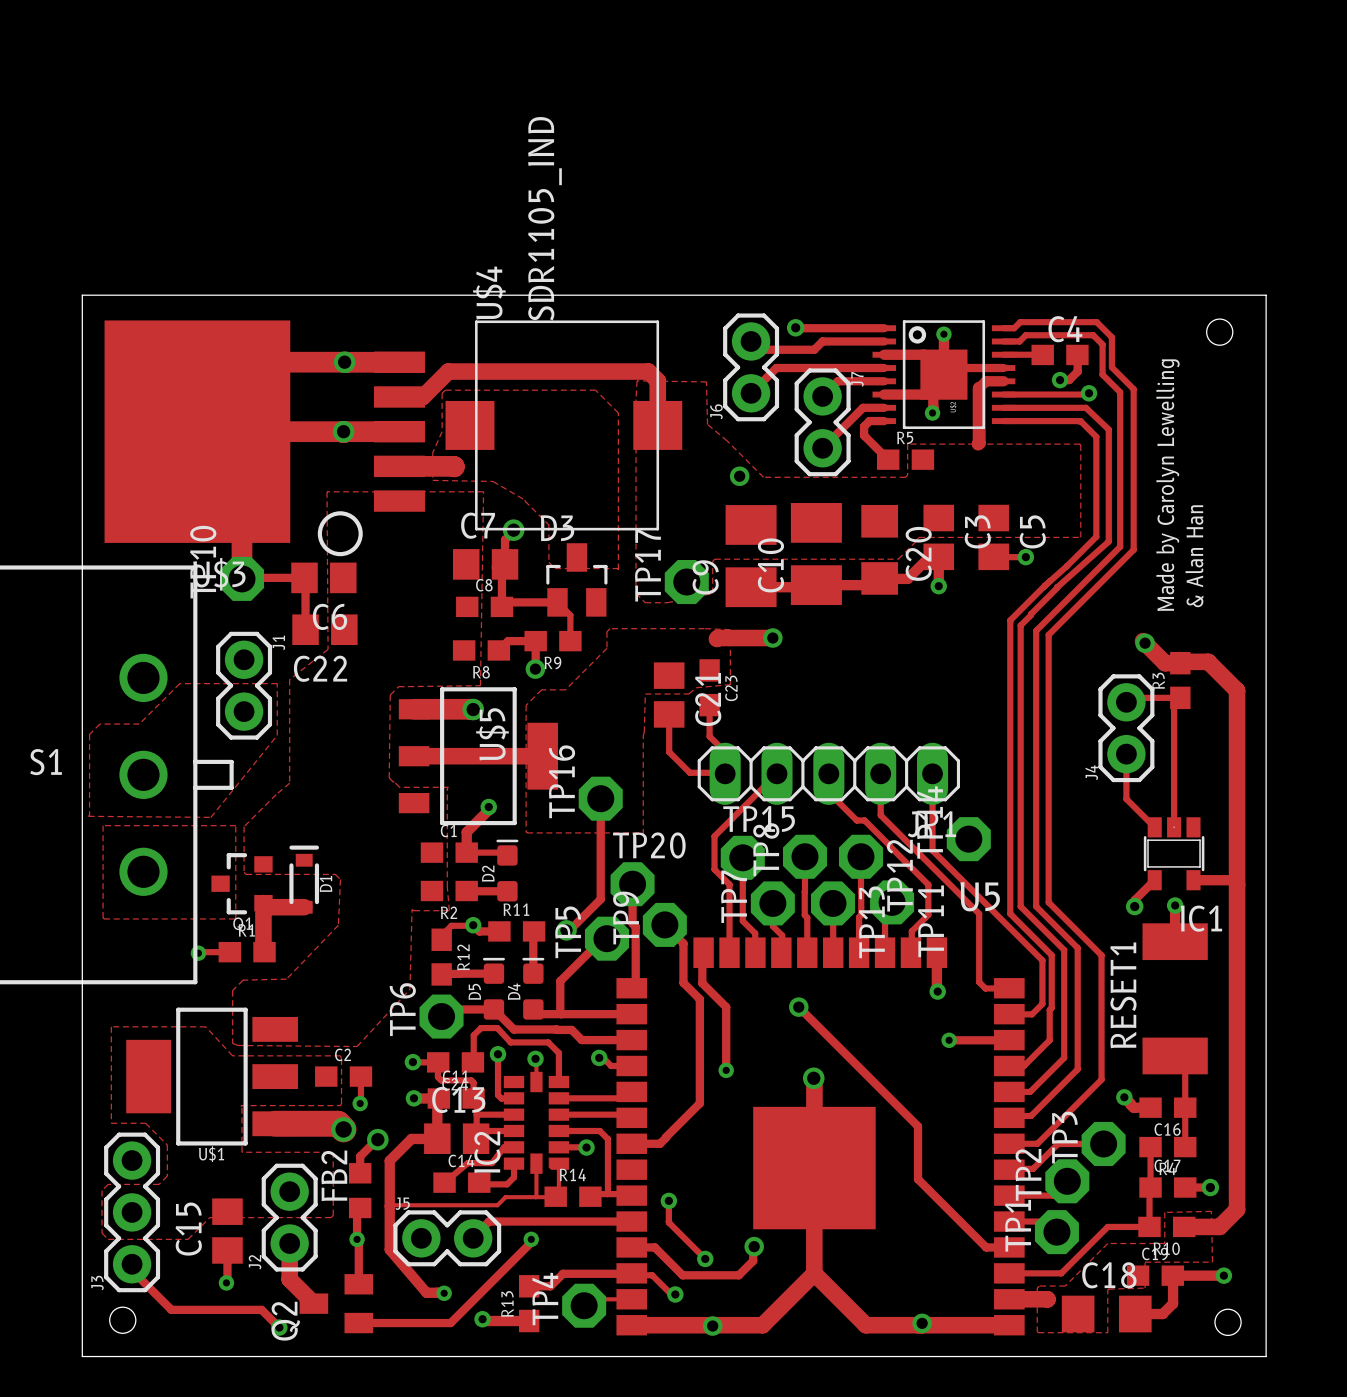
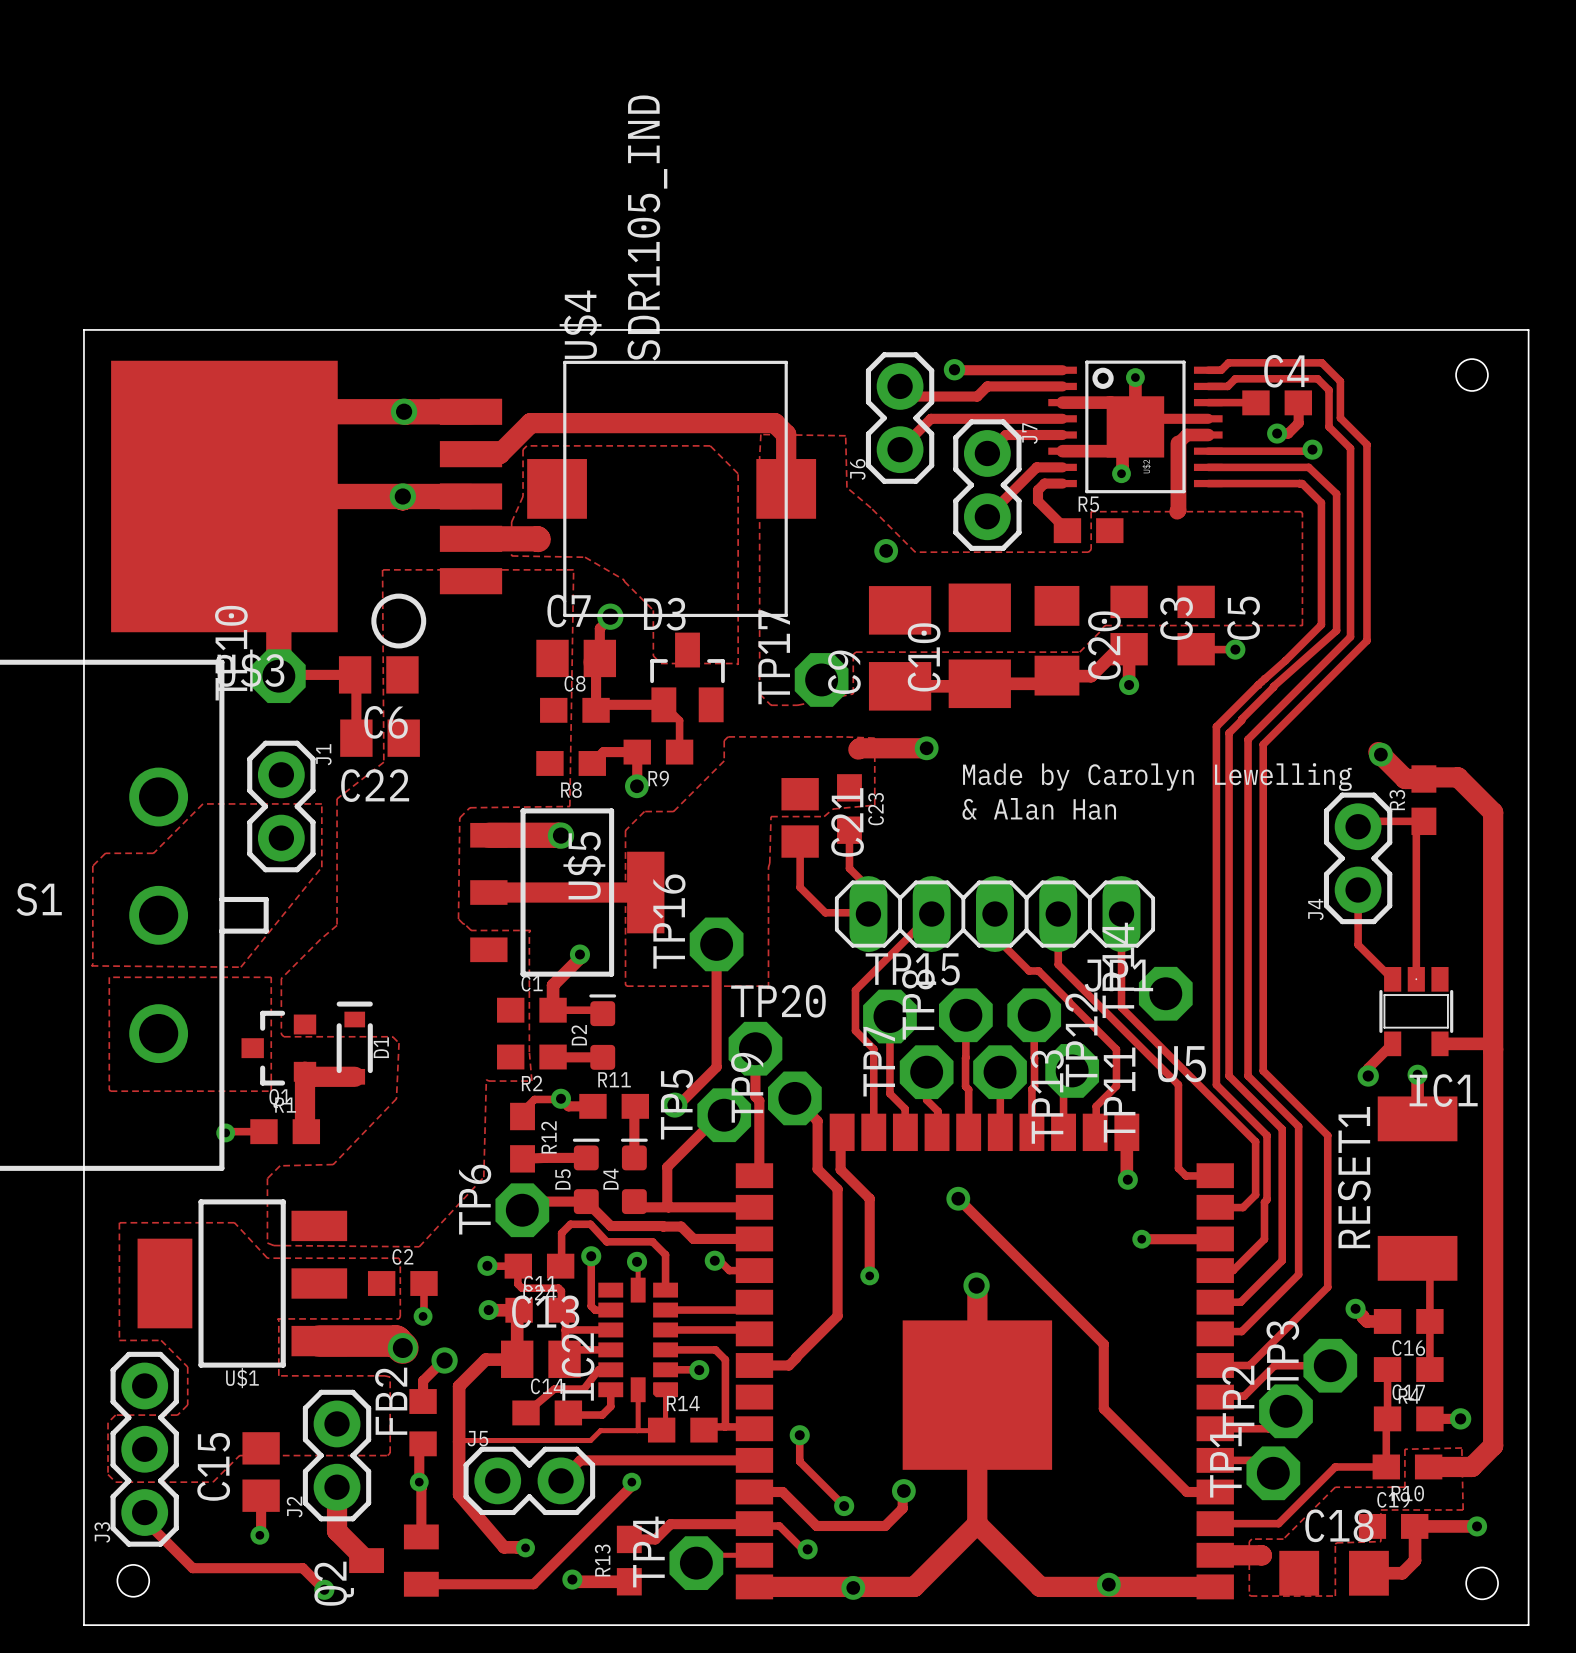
text rotation: 0° (1167, 485) -> 90° clockwise (1157, 777)
text rotation: 0° (1194, 556) -> 90° clockwise (1039, 808)
text position: & Alan Han (1194, 556) -> & Alan Han (1039, 808)

